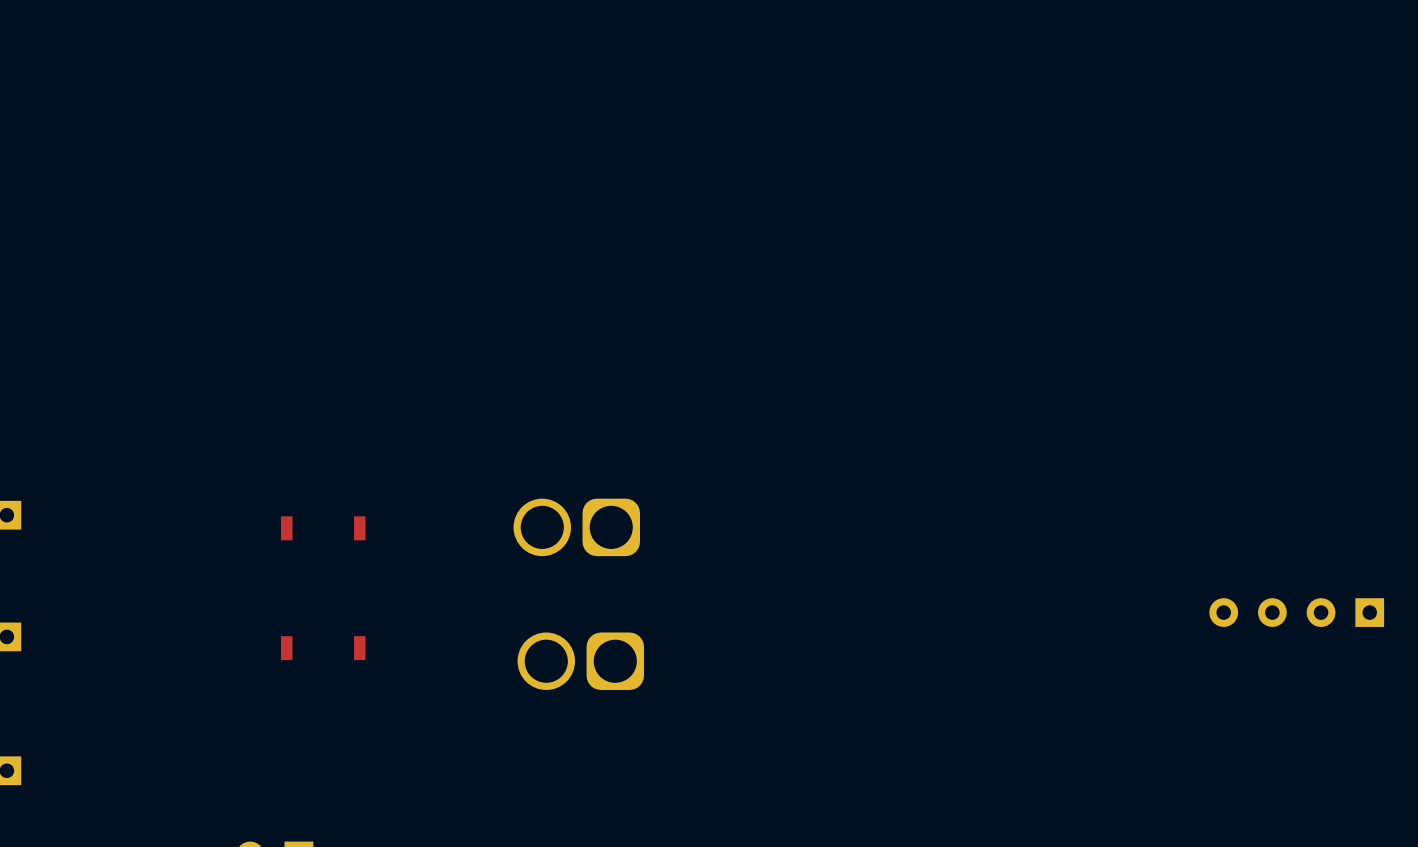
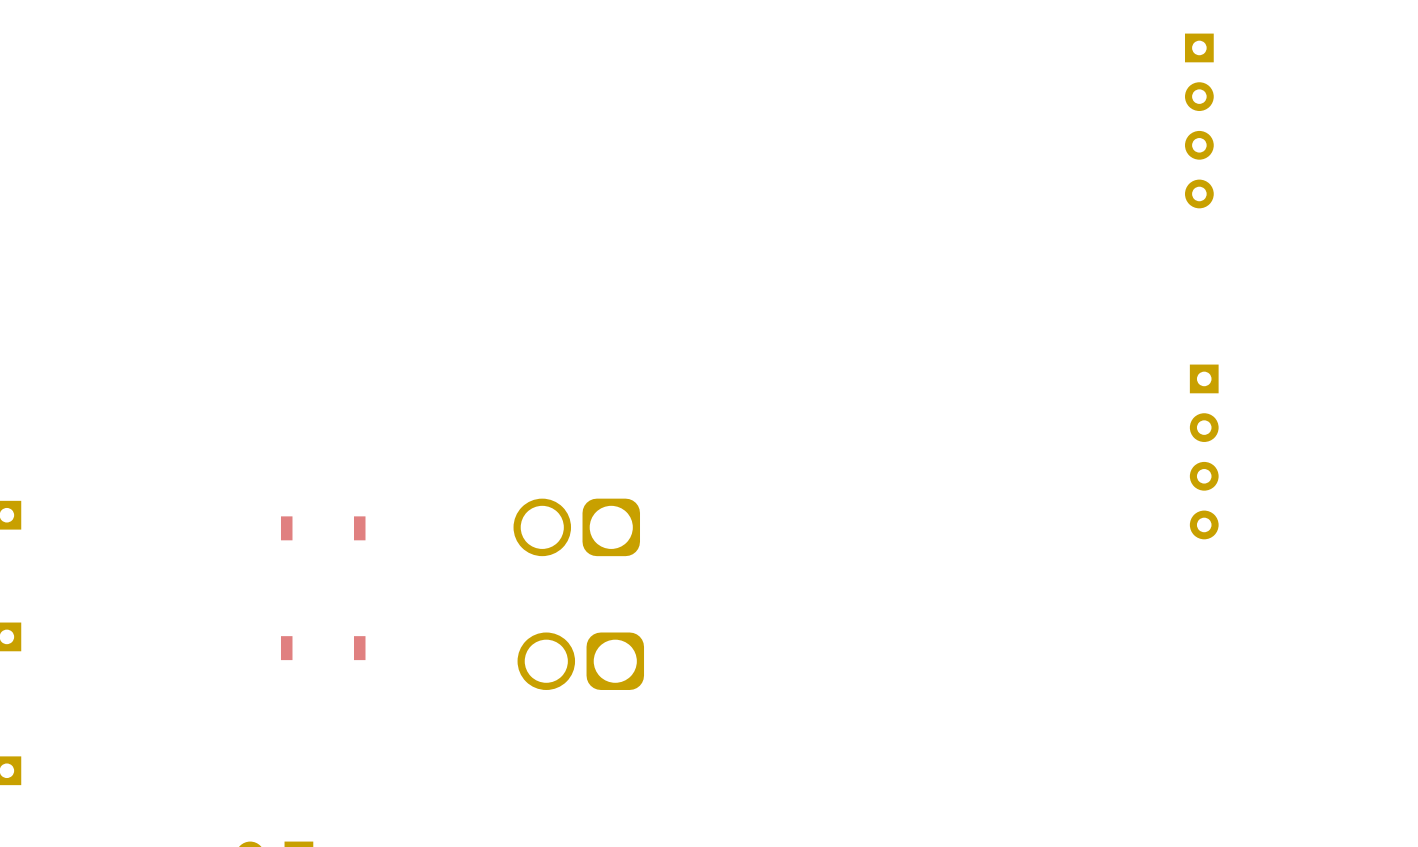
part: none -> (1199, 120)
part rotation: 0° (1296, 612) -> 90° counterclockwise (1204, 451)
part position: (1296, 612) -> (1204, 451)

